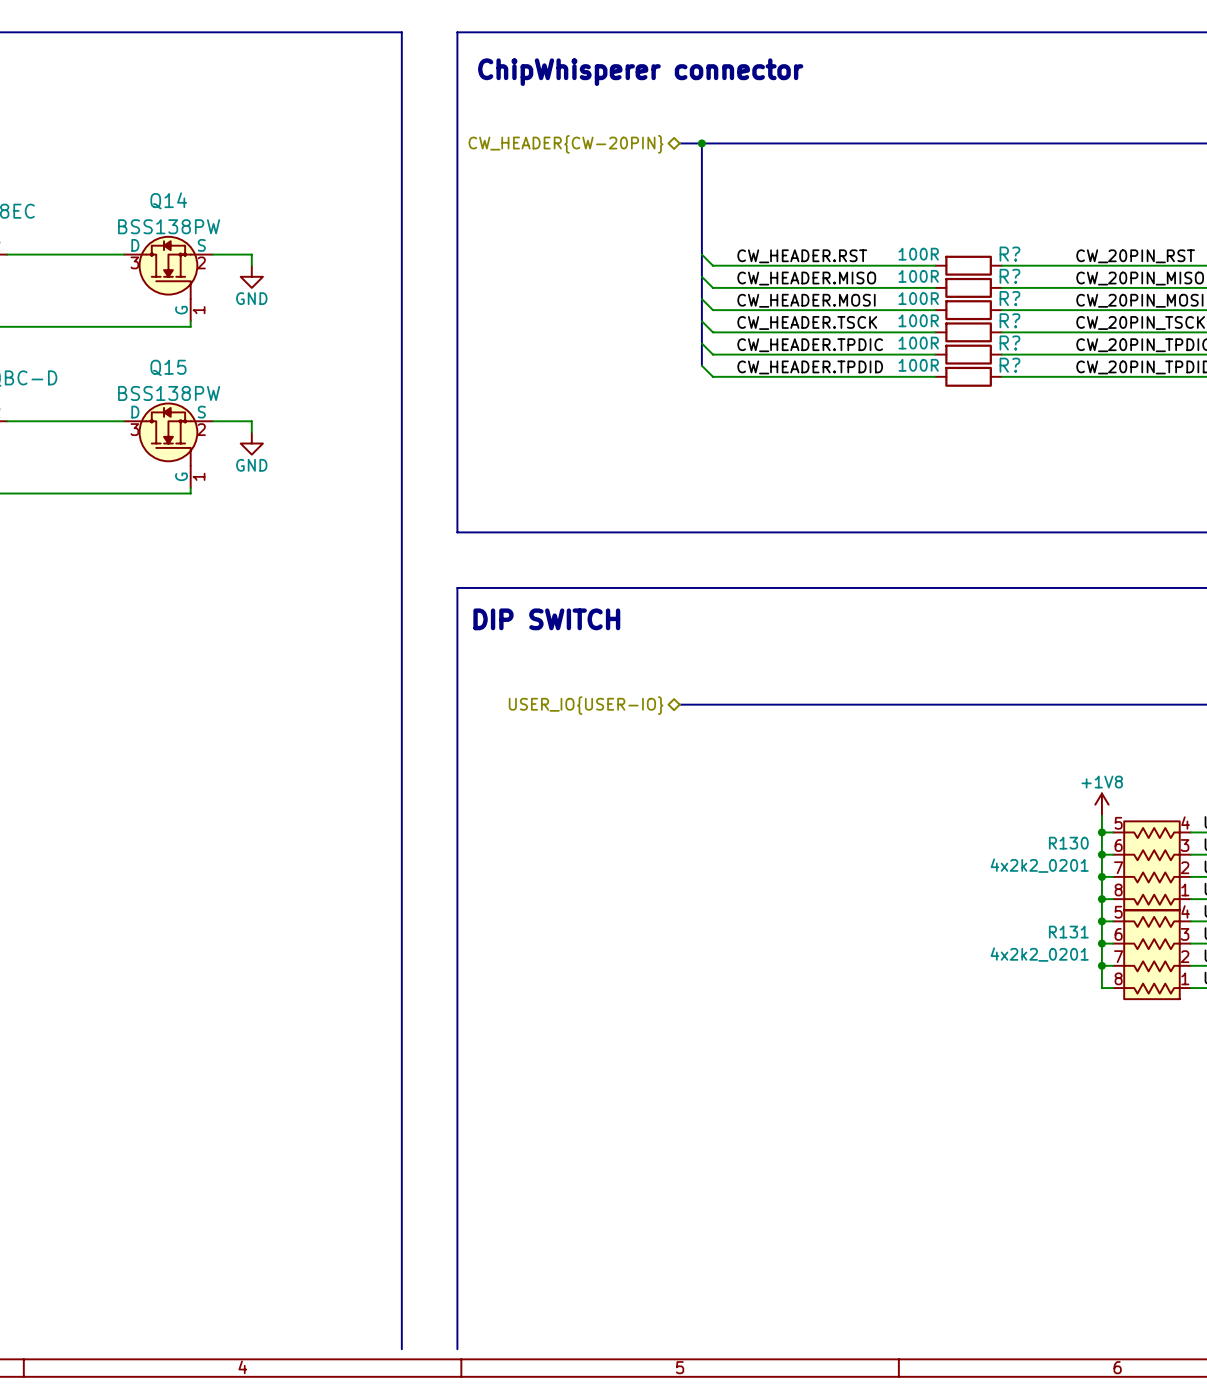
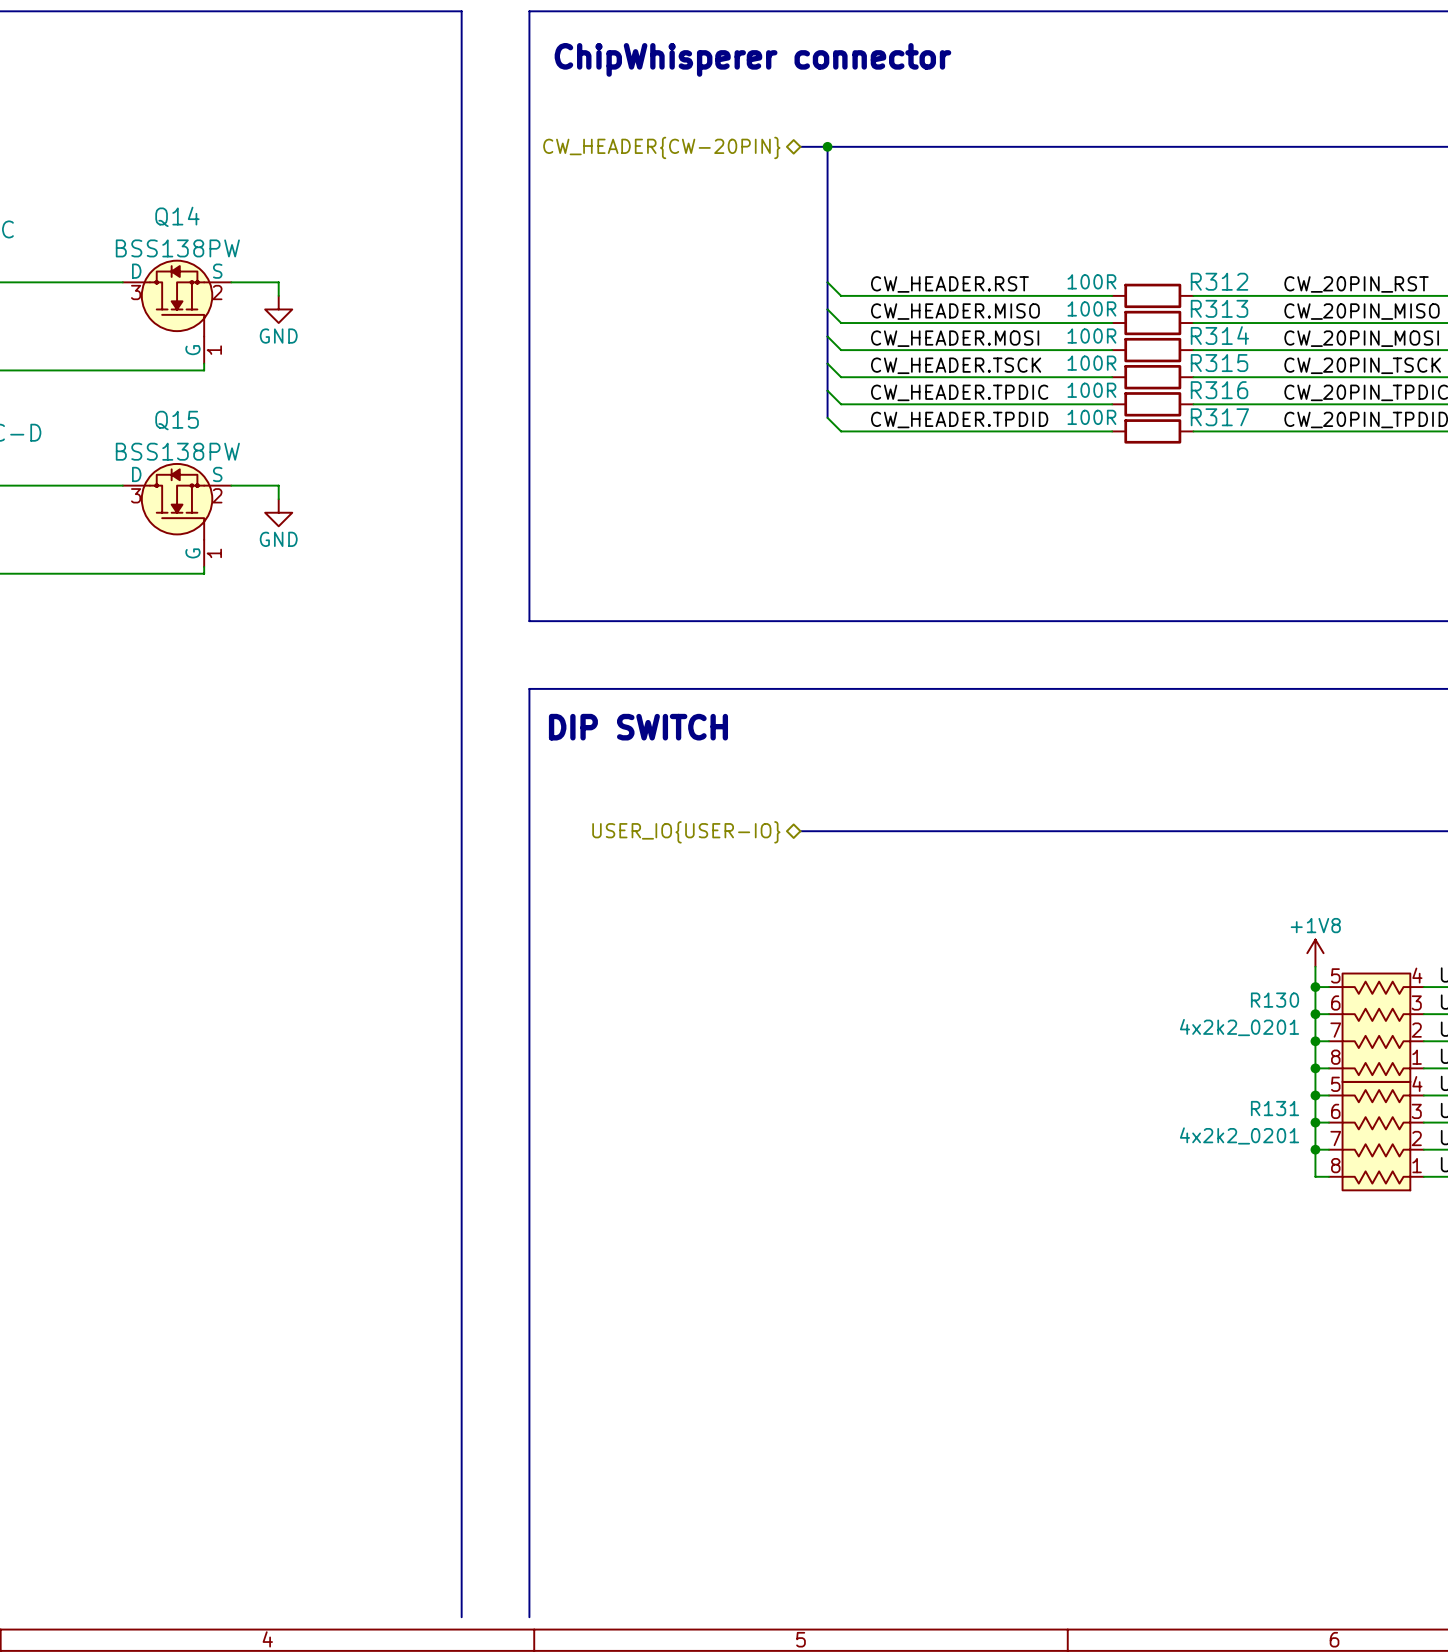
R? name: R? (1009, 254) -> R312 (1219, 281)
R? name: R? (1009, 276) -> R313 (1219, 308)
R? name: R? (1009, 298) -> R314 (1219, 335)
R? name: R? (1009, 320) -> R315 (1219, 363)
R? name: R? (1009, 342) -> R316 (1219, 390)
R? name: R? (1009, 365) -> R317 (1219, 417)

